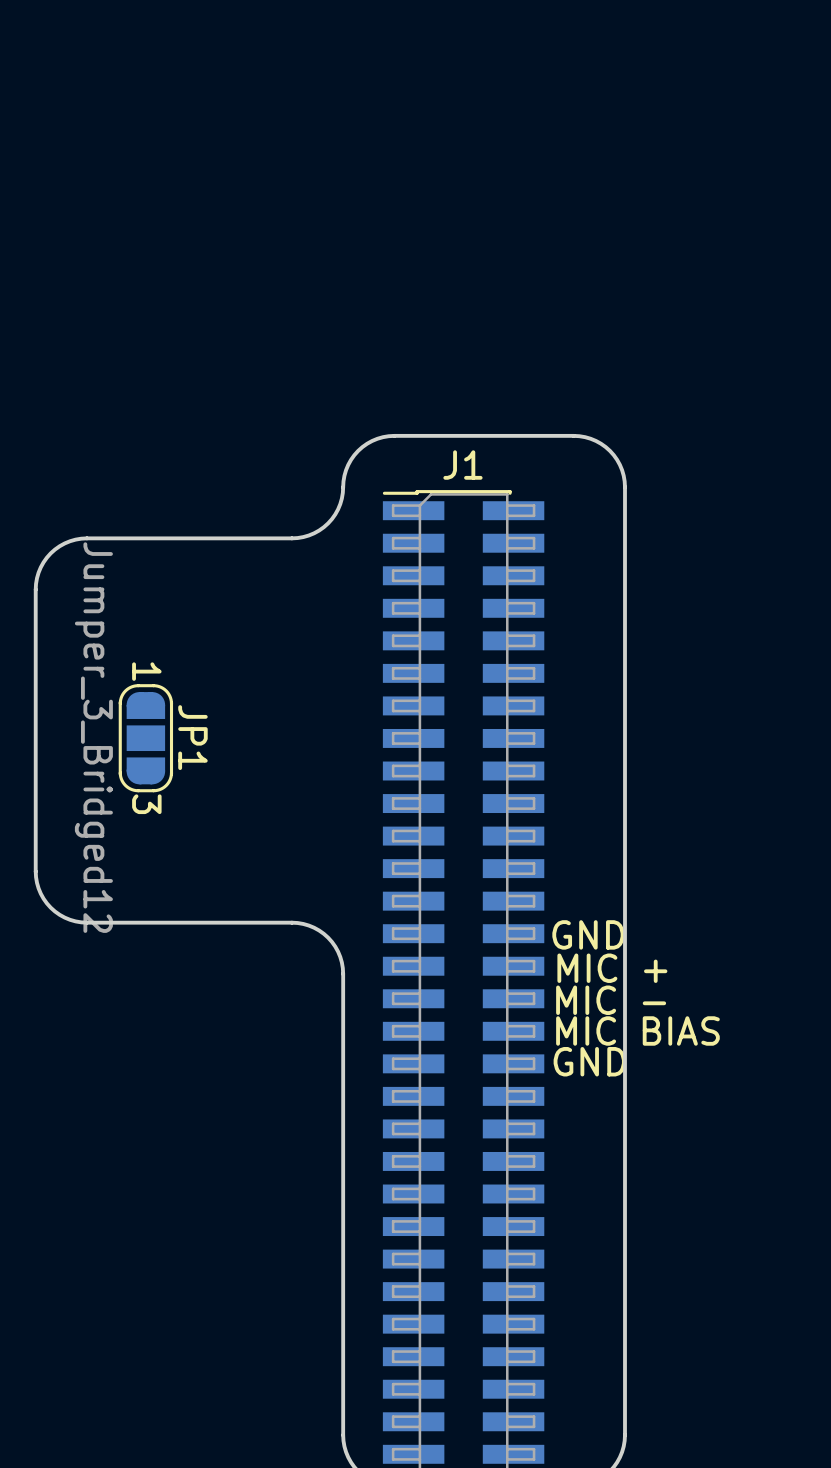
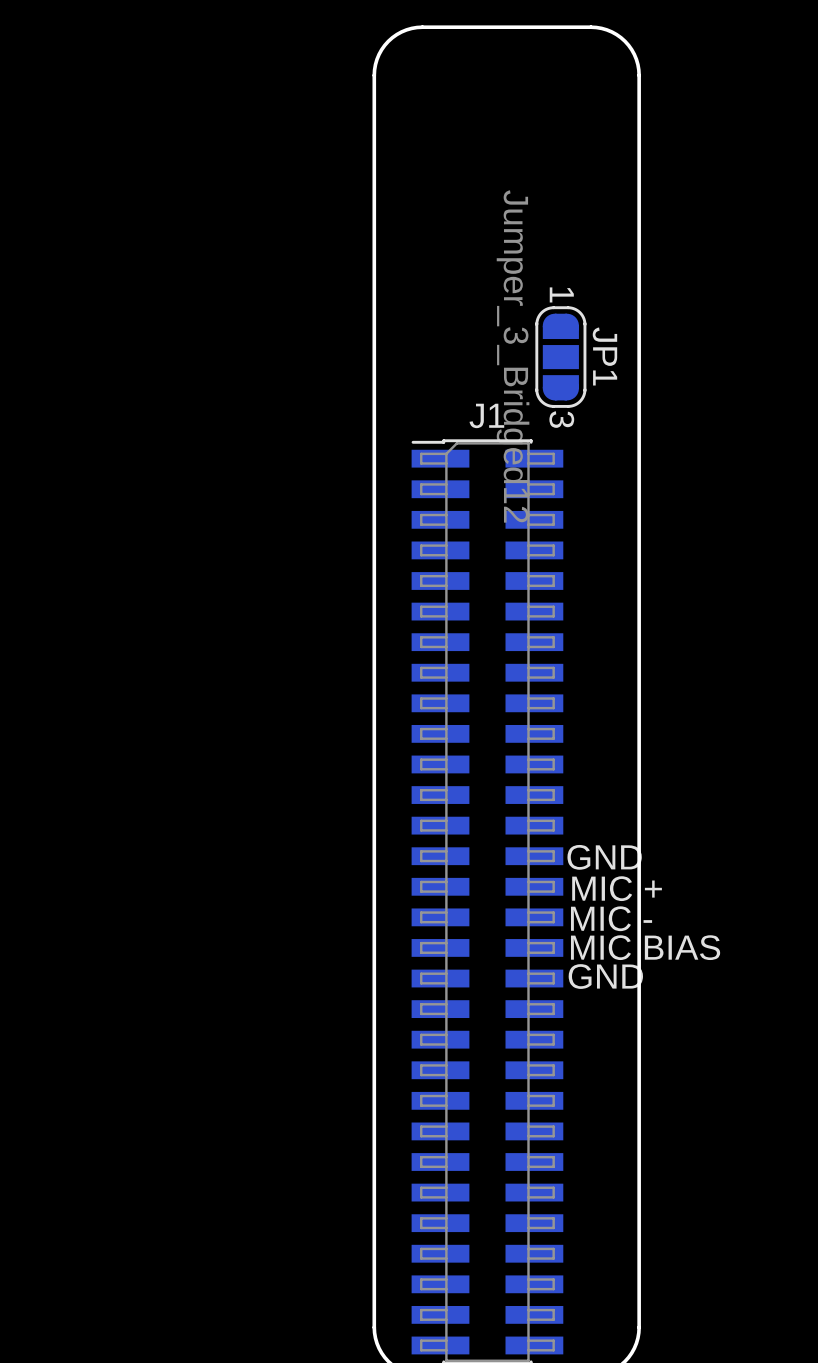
board edge: (624, 487) (622, 470) (613, 455) (601, 443) (585, 437) (388, 436) (367, 443) (354, 455) (346, 470) (341, 498) (335, 514) (323, 527) (308, 535) (291, 538) (81, 538) (59, 546) (43, 562) (37, 578) (35, 589) (35, 871) (38, 888) (46, 903) (64, 917) (81, 922) (303, 923) (319, 930) (331, 941) (340, 956) (343, 973) -> (639, 436) (639, 75) (637, 64) (631, 49) (616, 34) (596, 27) (422, 27) (406, 29) (396, 34) (384, 45) (379, 54) (374, 75) (374, 894)
JP1 position: (145, 738) -> (560, 357)

